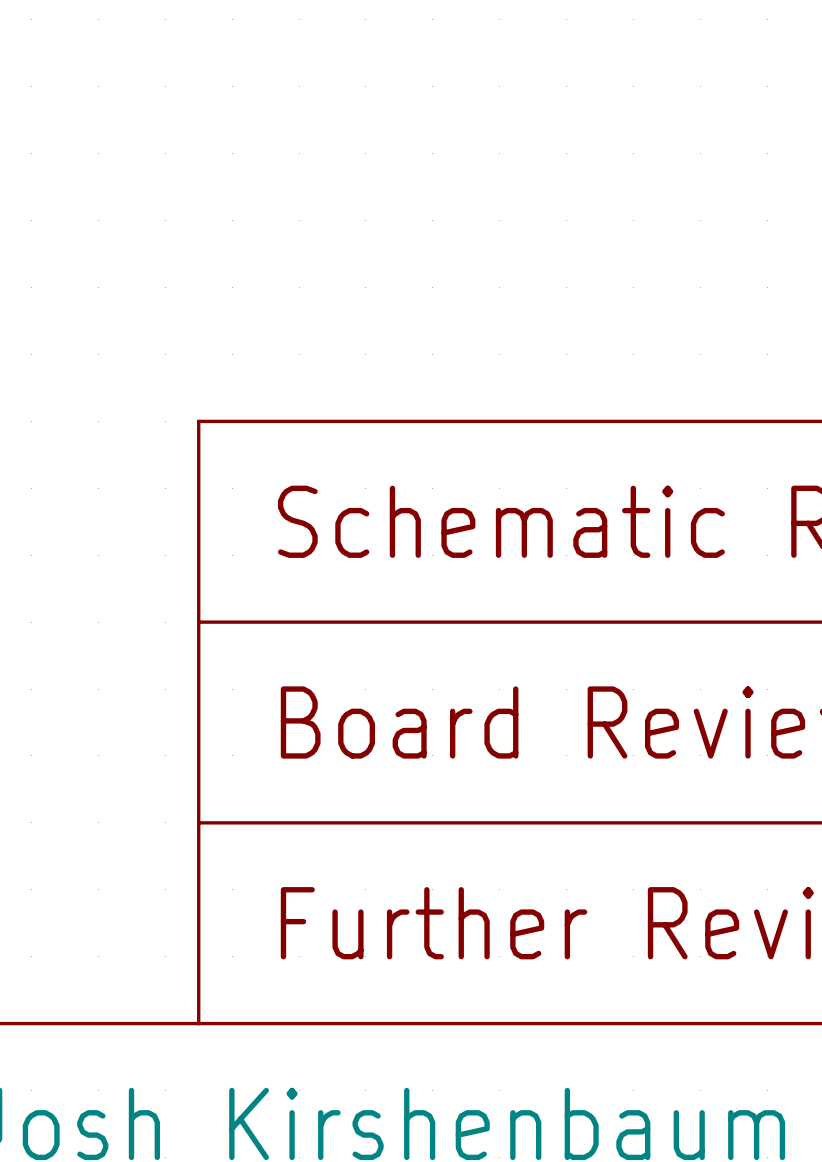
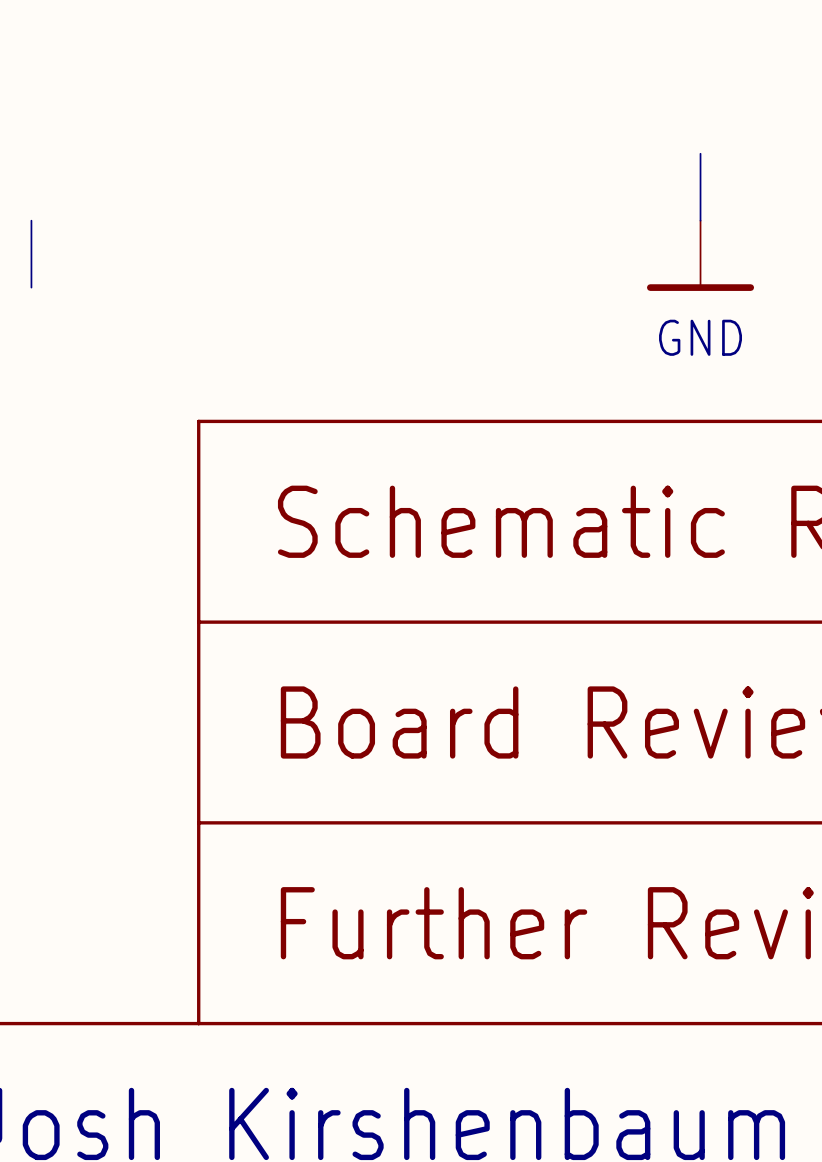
wire: none -> (700, 153) (700, 220)
wire: none -> (31, 220) (31, 287)
power symbol: none -> GND (700, 255)

